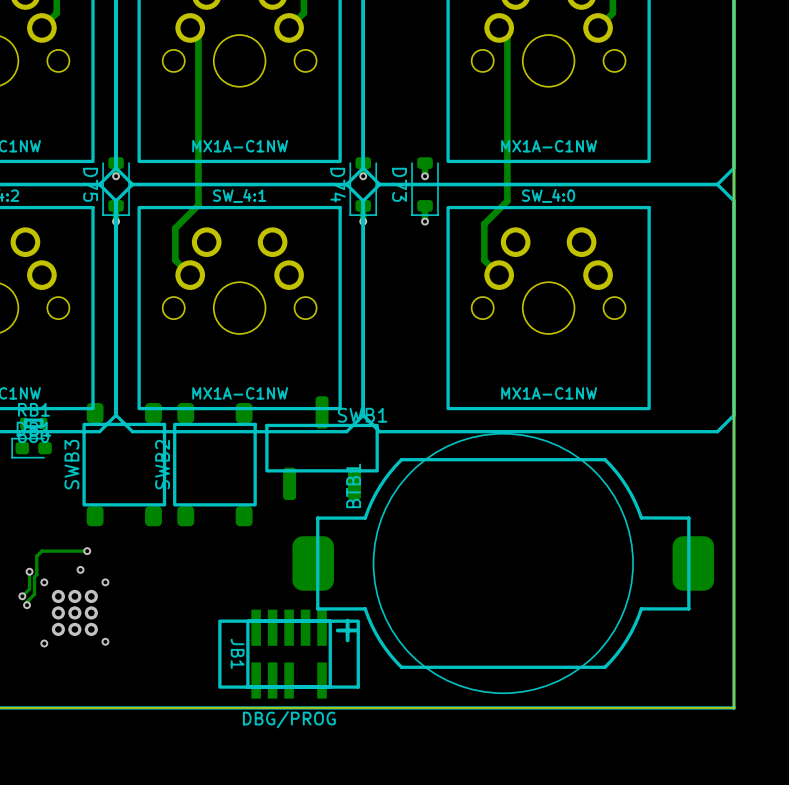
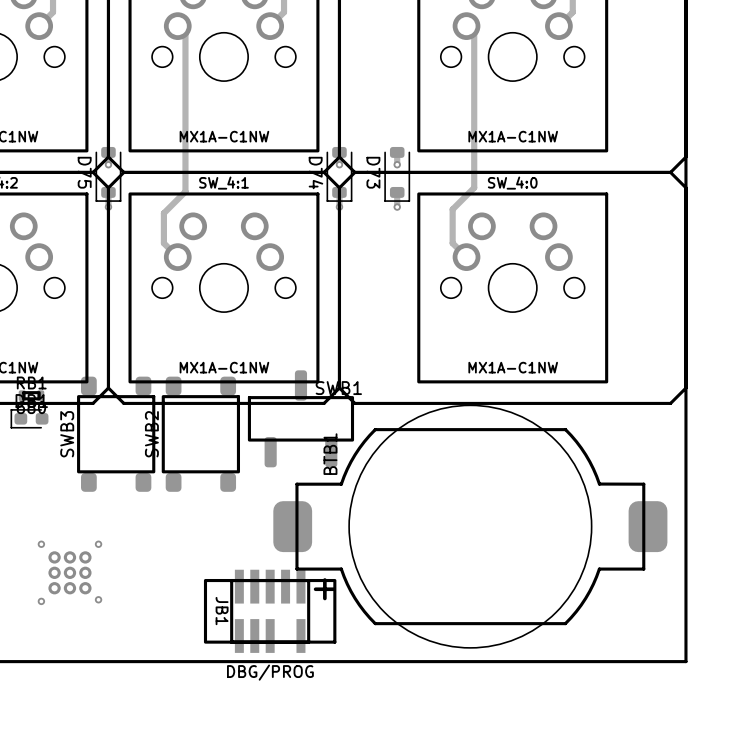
track: (87, 551) (41, 551) (36, 556) (34, 594) (27, 601) (27, 605) -> none
via: (87, 551) -> none
via: (80, 569) -> none
track: (29, 571) (29, 589) (22, 596) -> none
via: (29, 571) -> none
via: (22, 596) -> none
via: (27, 605) -> none

